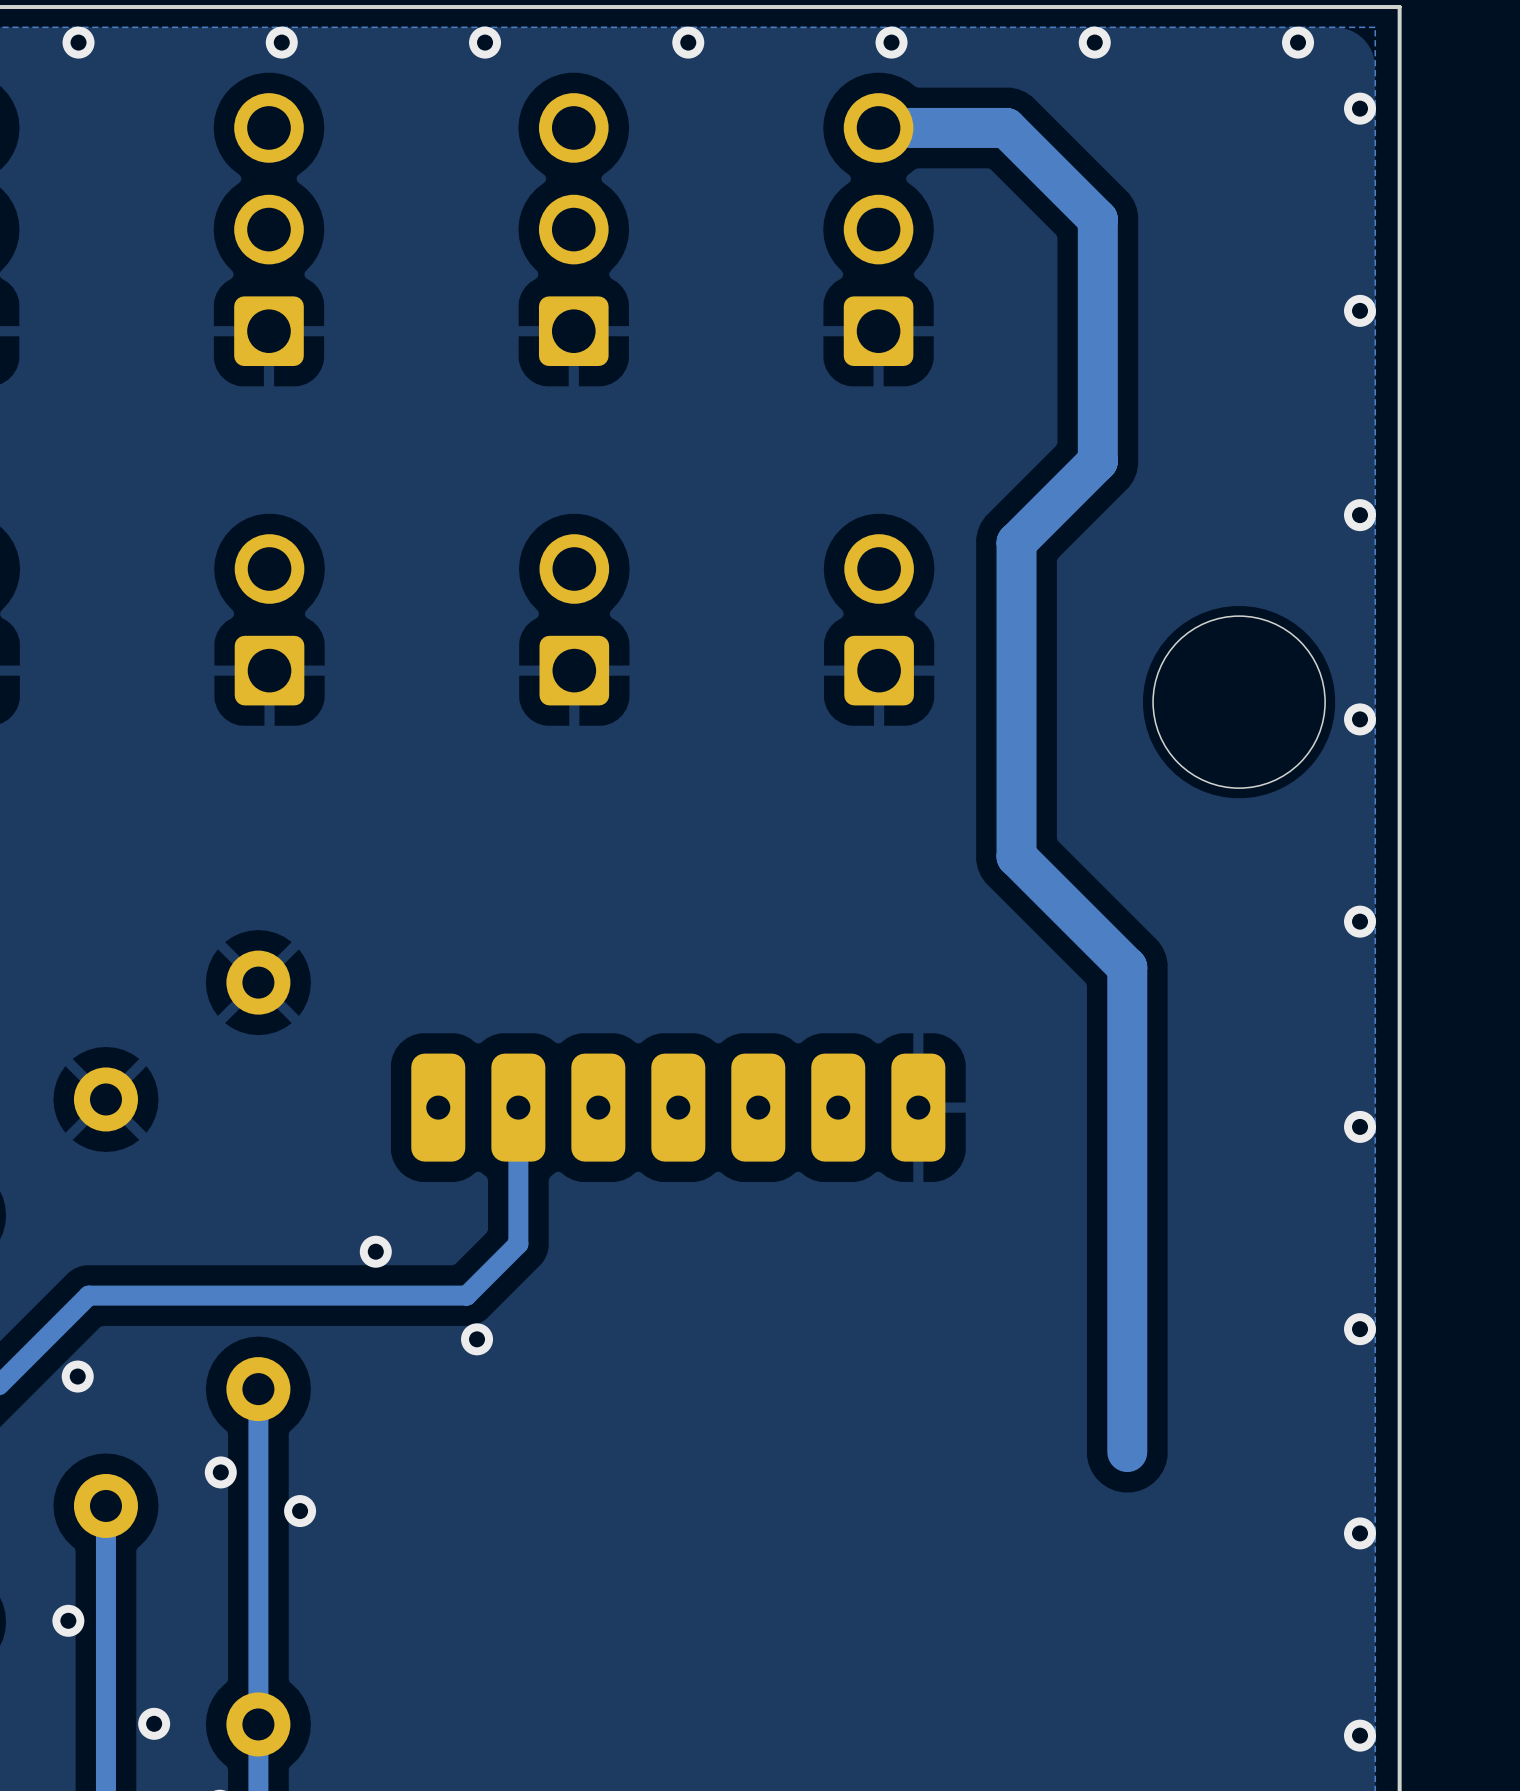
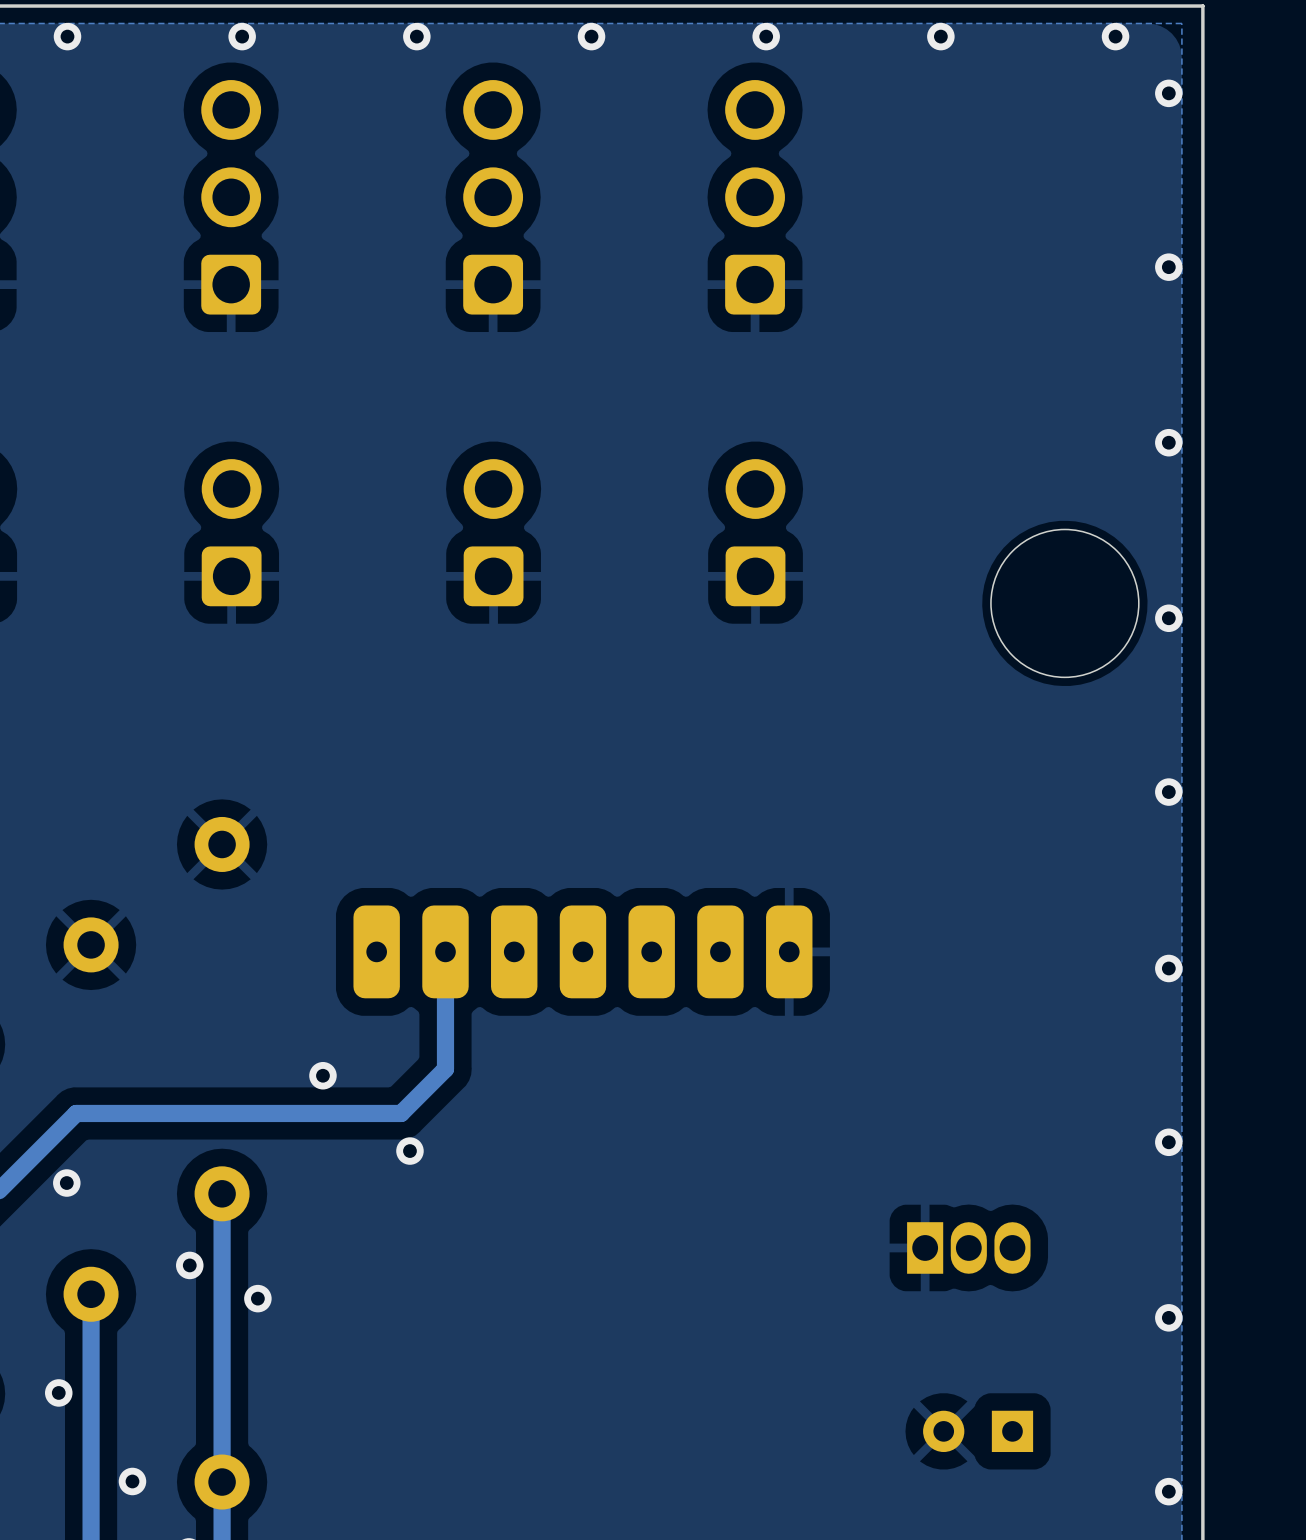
track: (878, 127) (1006, 127) (1097, 219) (1097, 461) (1016, 542) (1016, 856) (1127, 967) (1127, 1452) -> none
part: none -> (968, 1247)
part: none -> (978, 1431)

